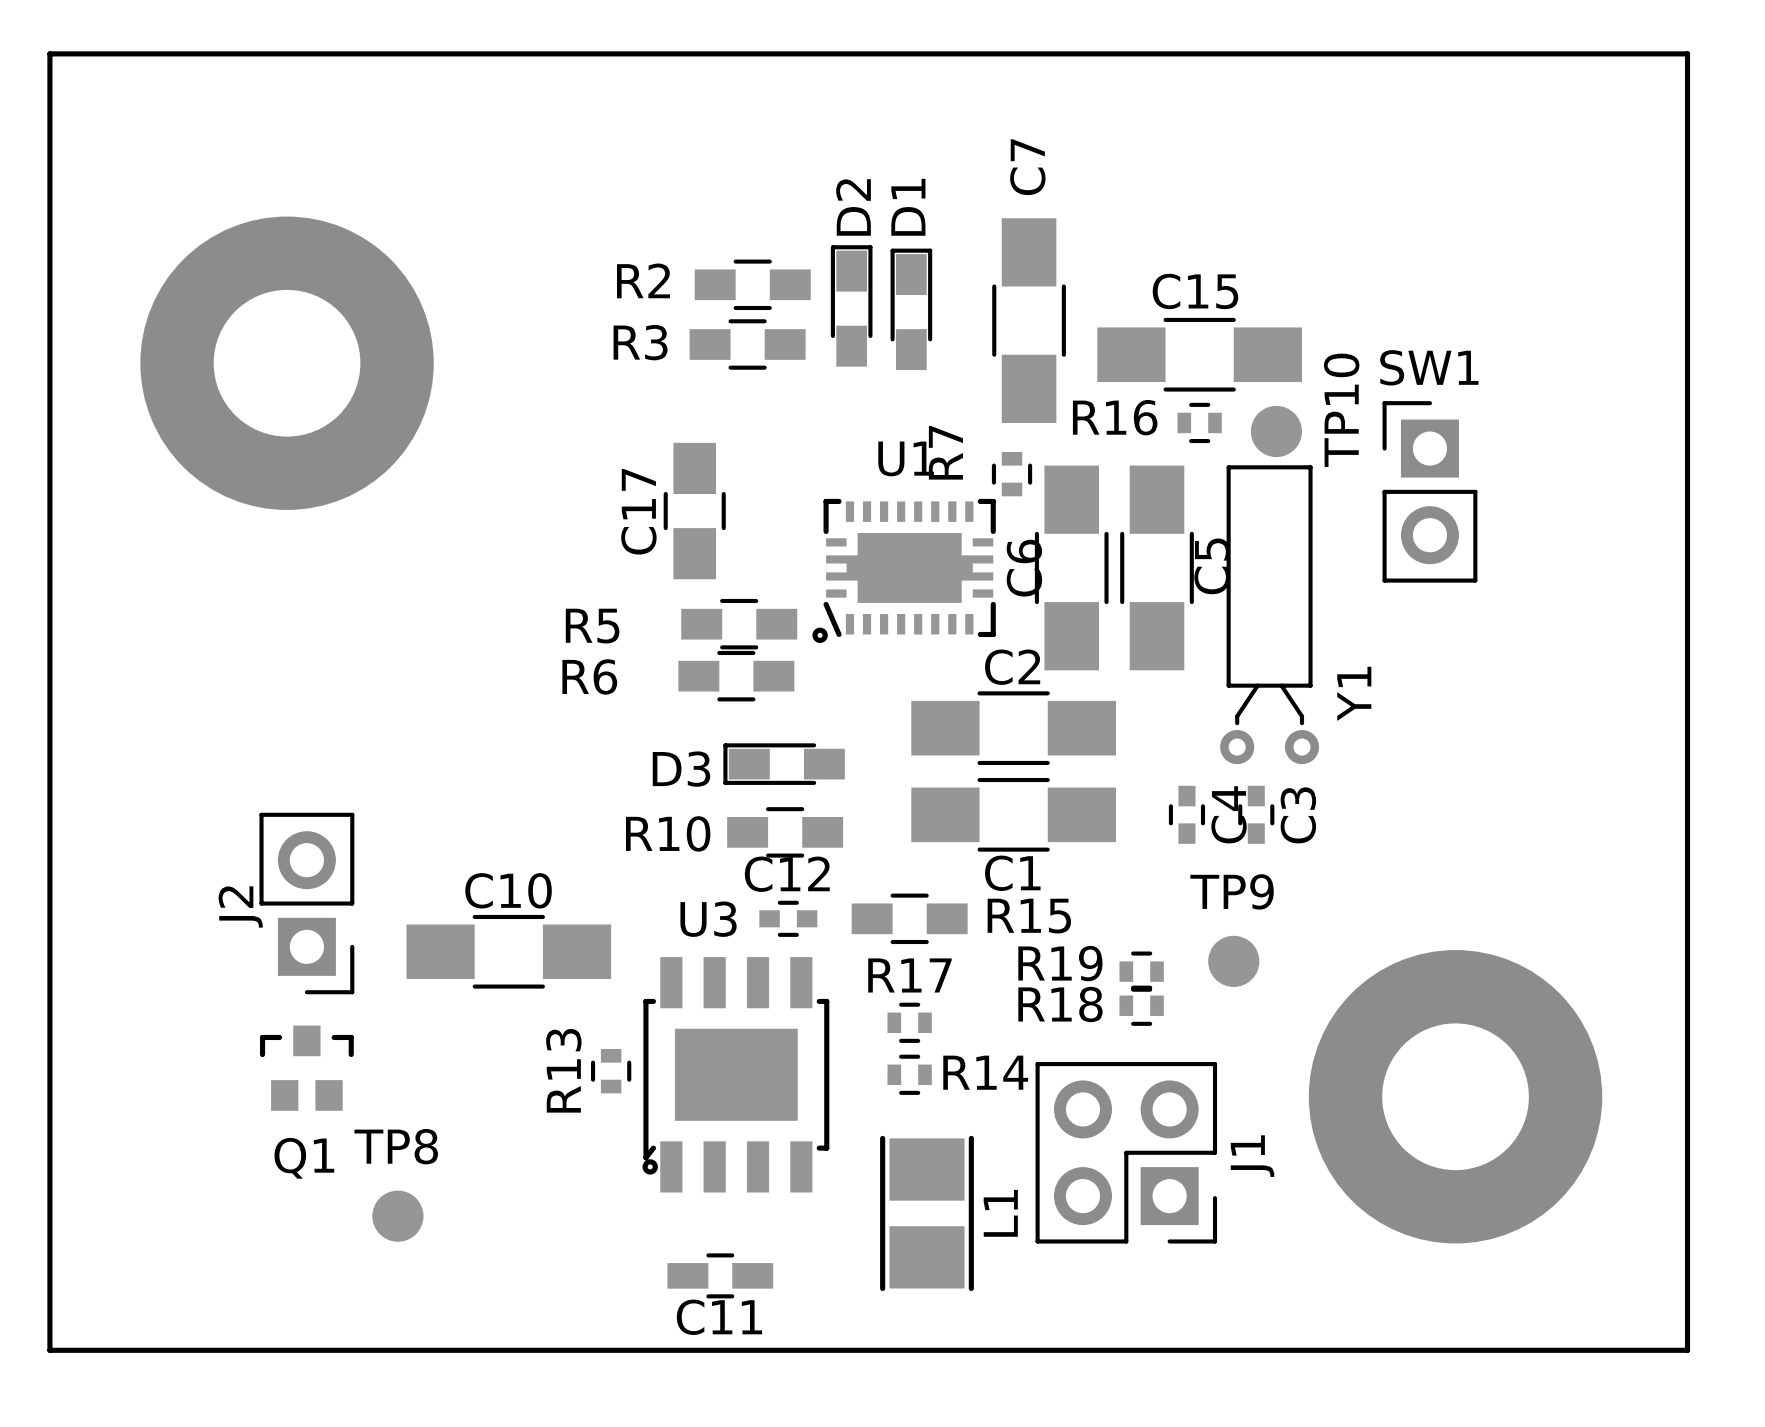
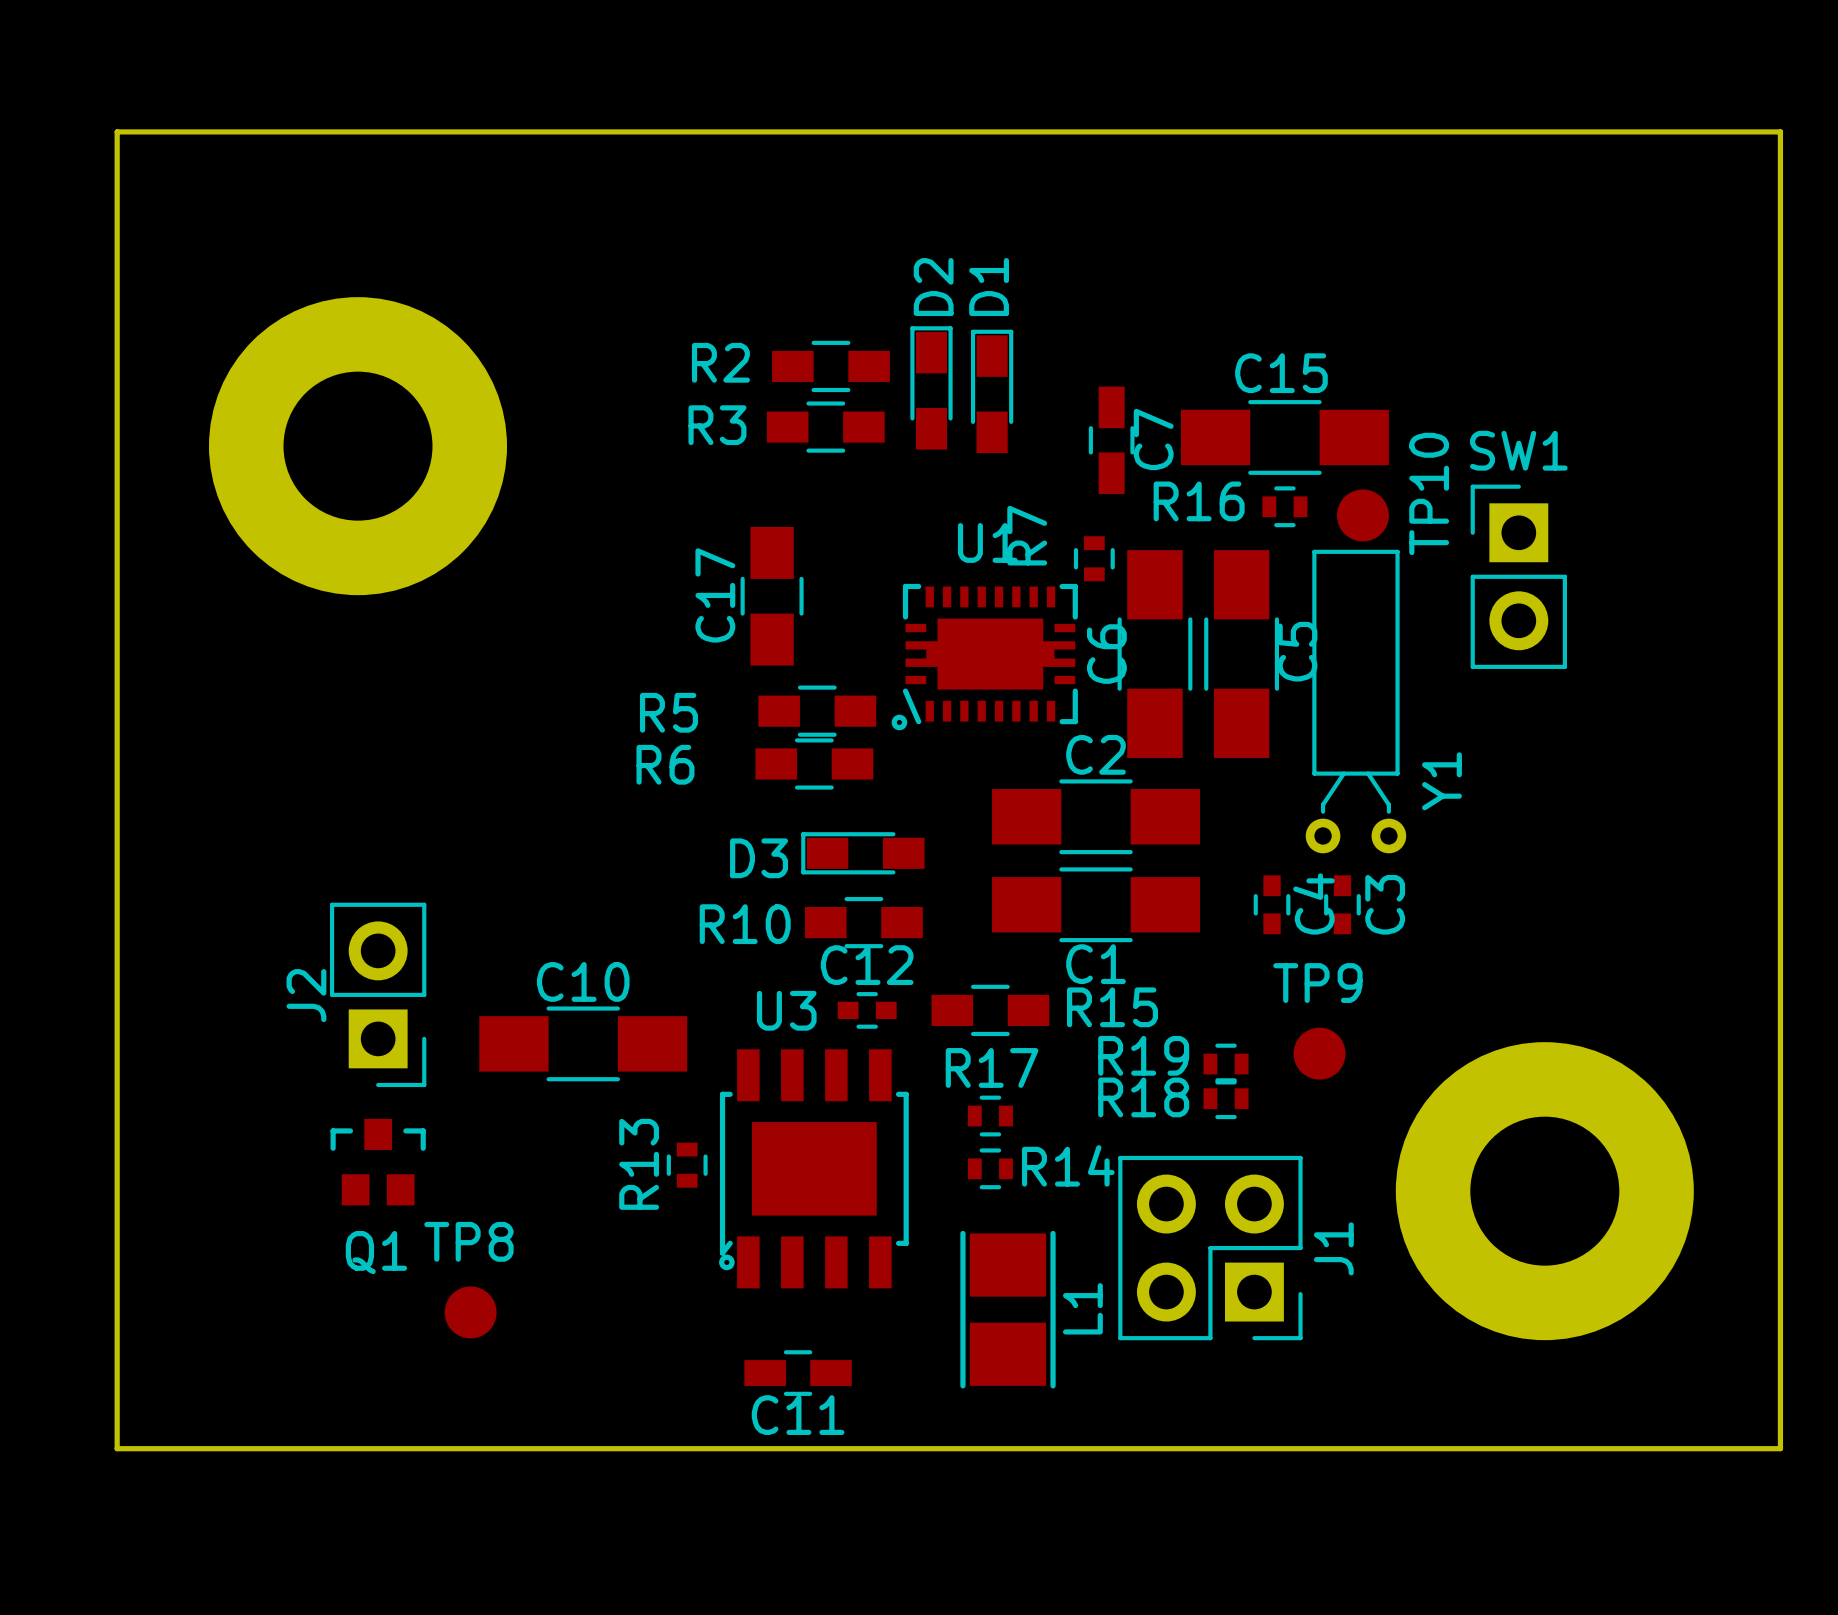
C7 name position: C7 (1027, 167) -> C7 (1153, 439)
C7 footprint: [992, 218, 1066, 423] -> [1088, 386, 1135, 495]

